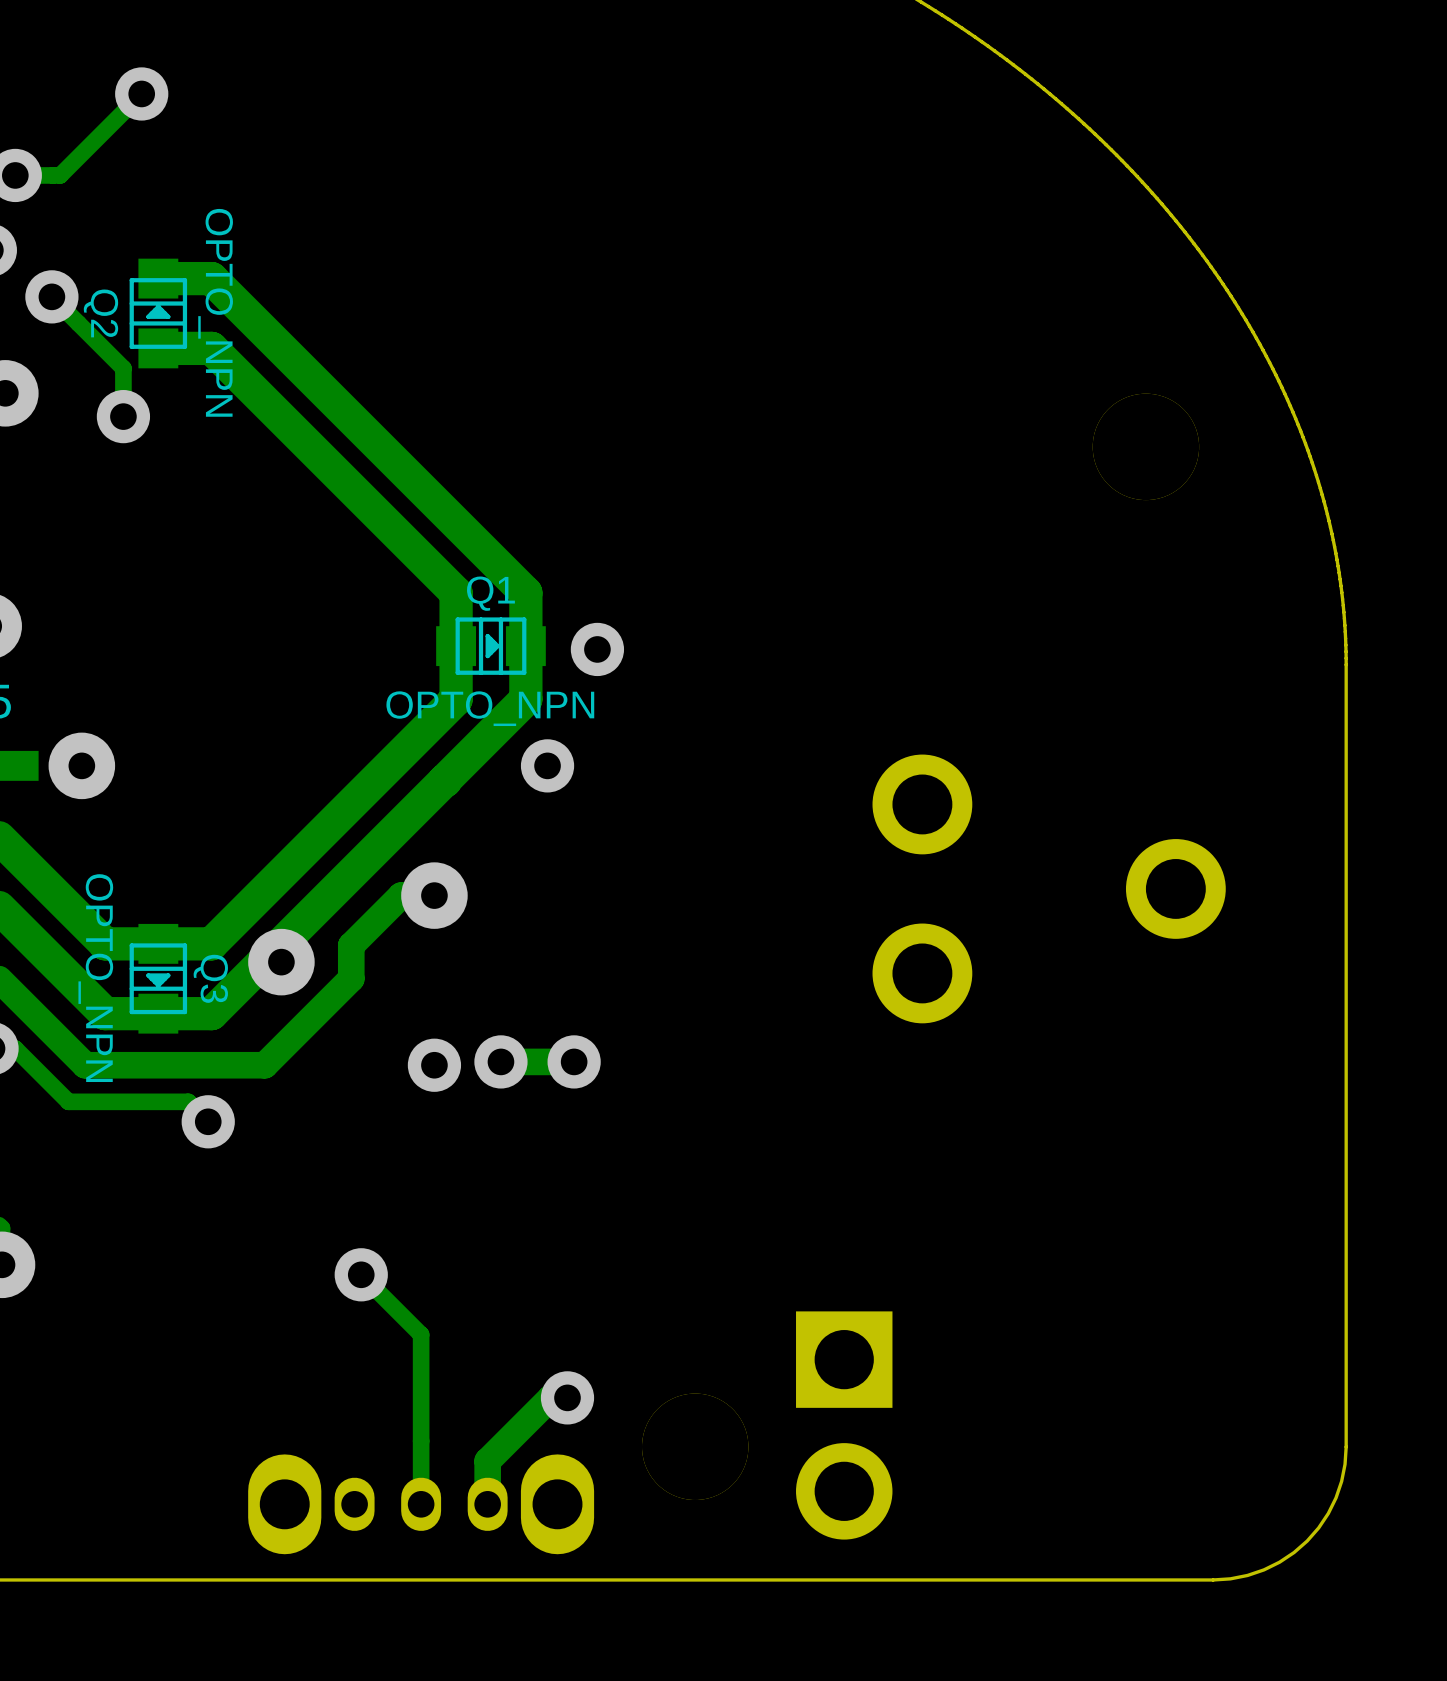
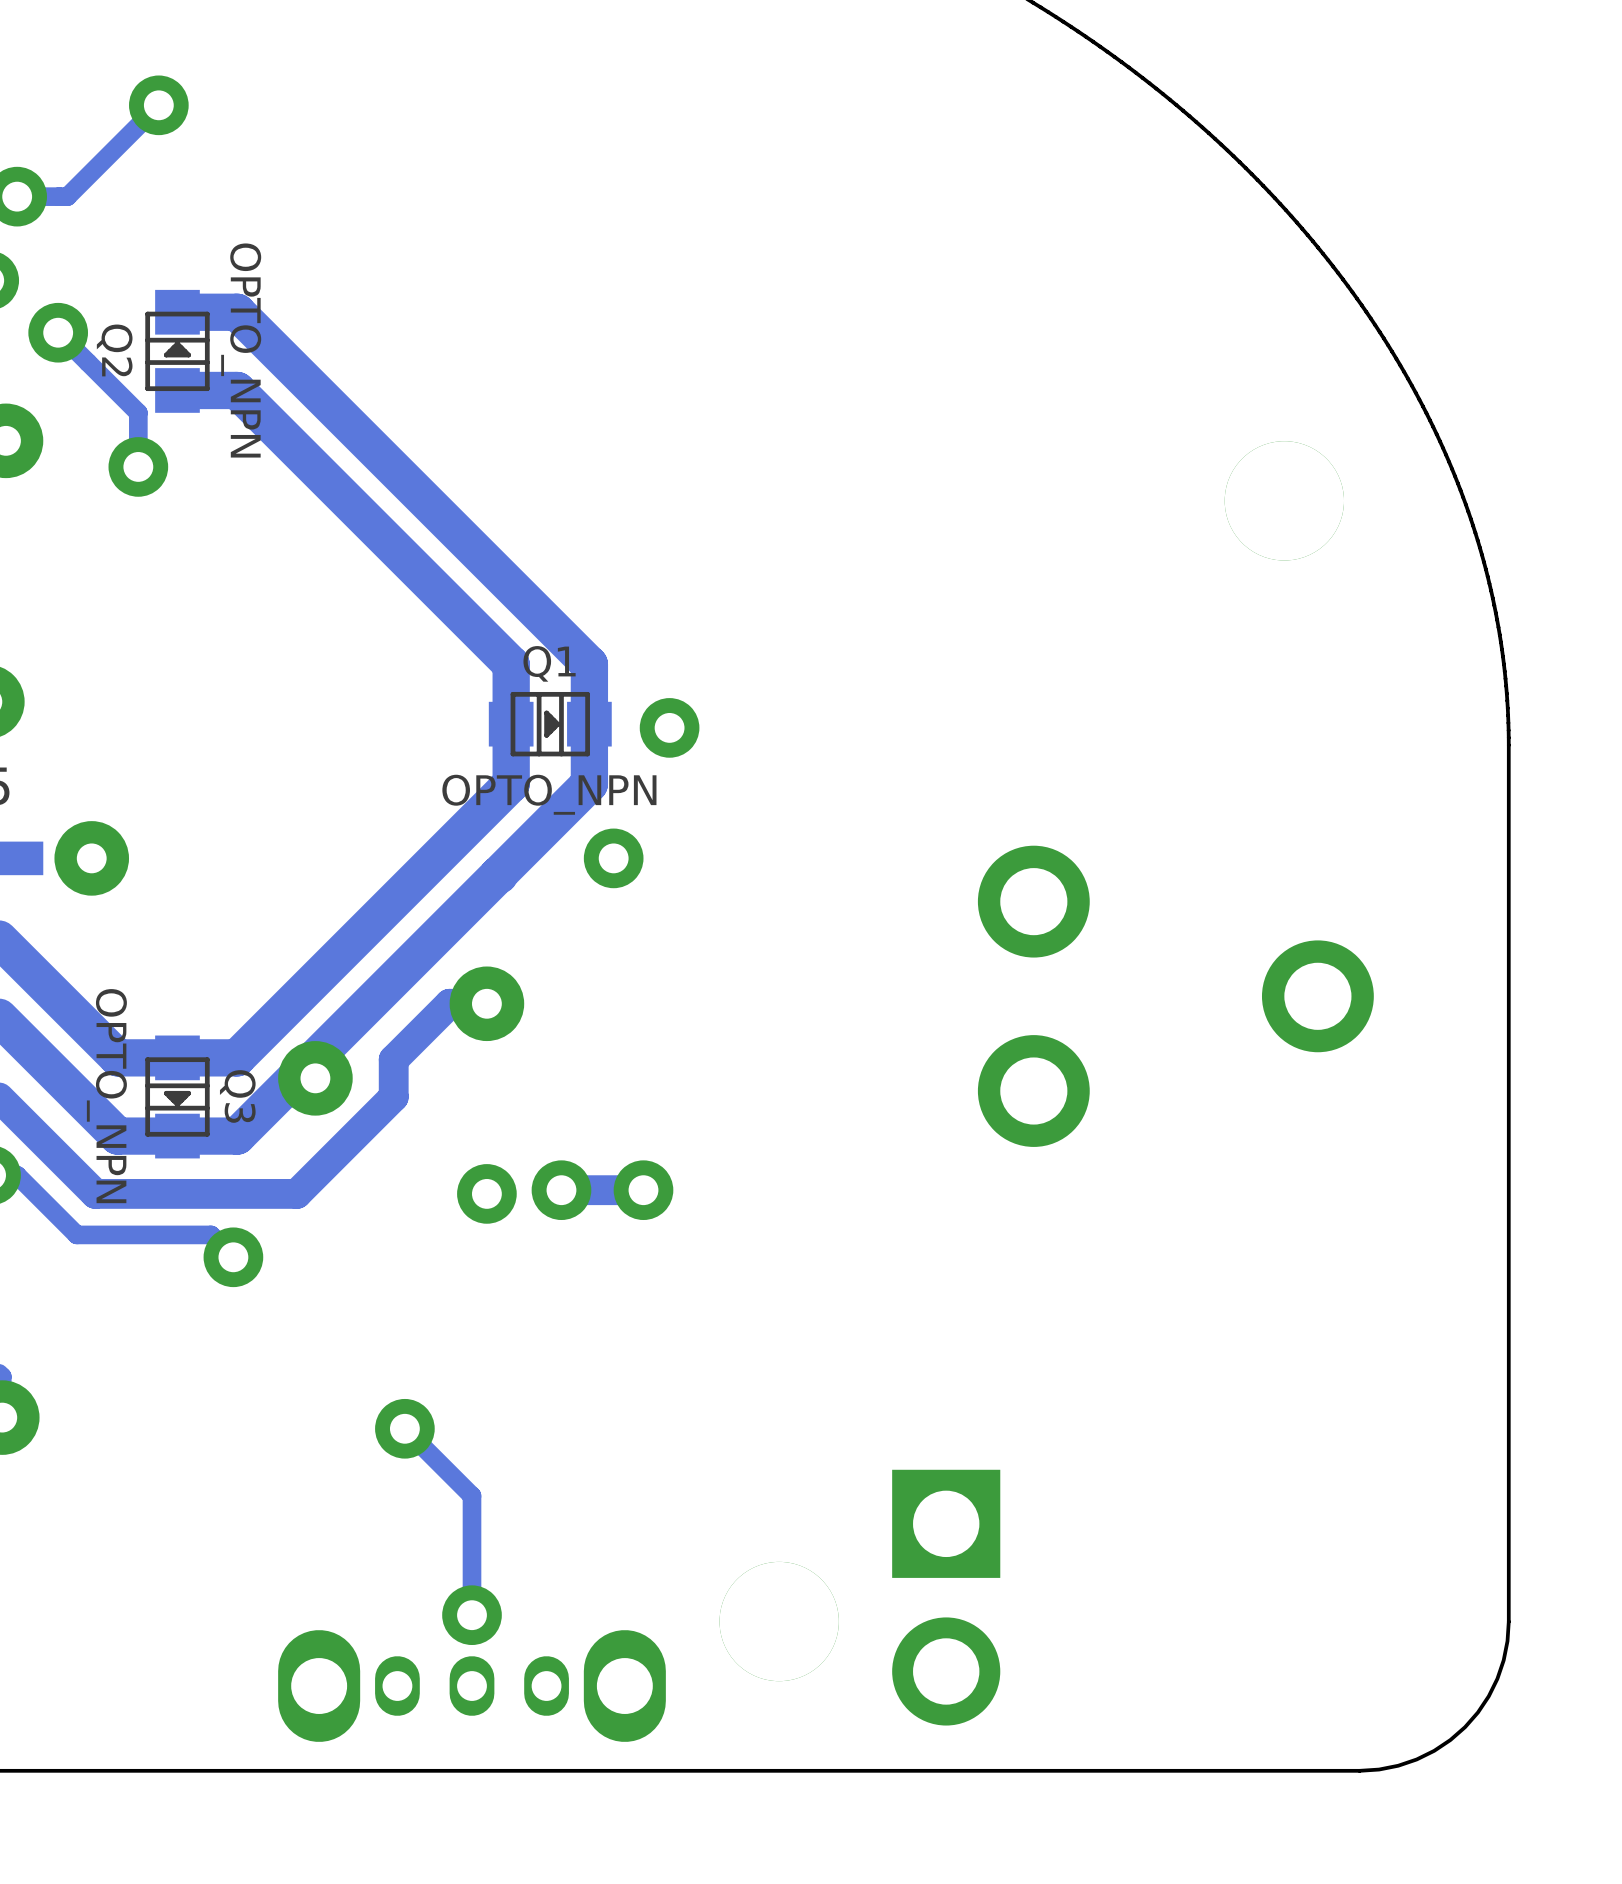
track: (567, 1397) (550, 1397) (487, 1461) (487, 1504) -> none
via position: (567, 1397) -> (472, 1615)
track: (421, 1441) (421, 1504) -> none

